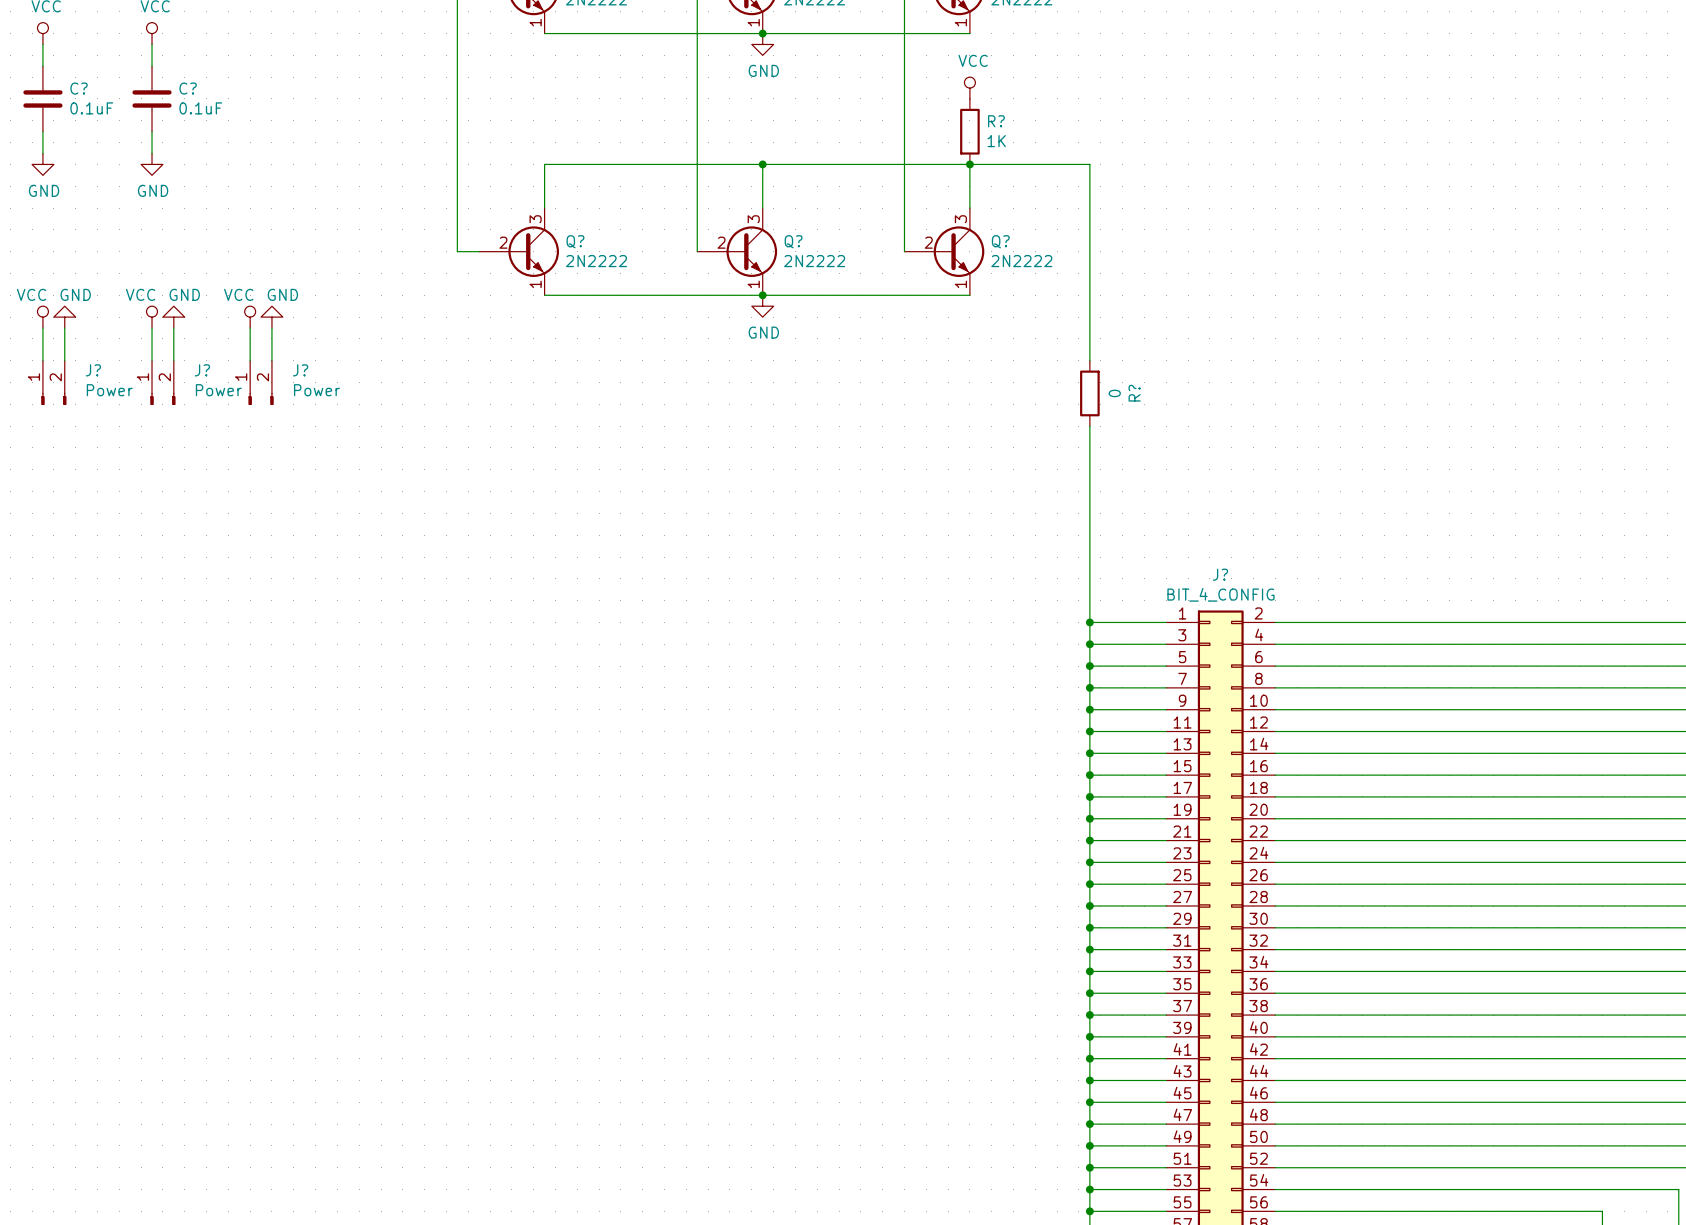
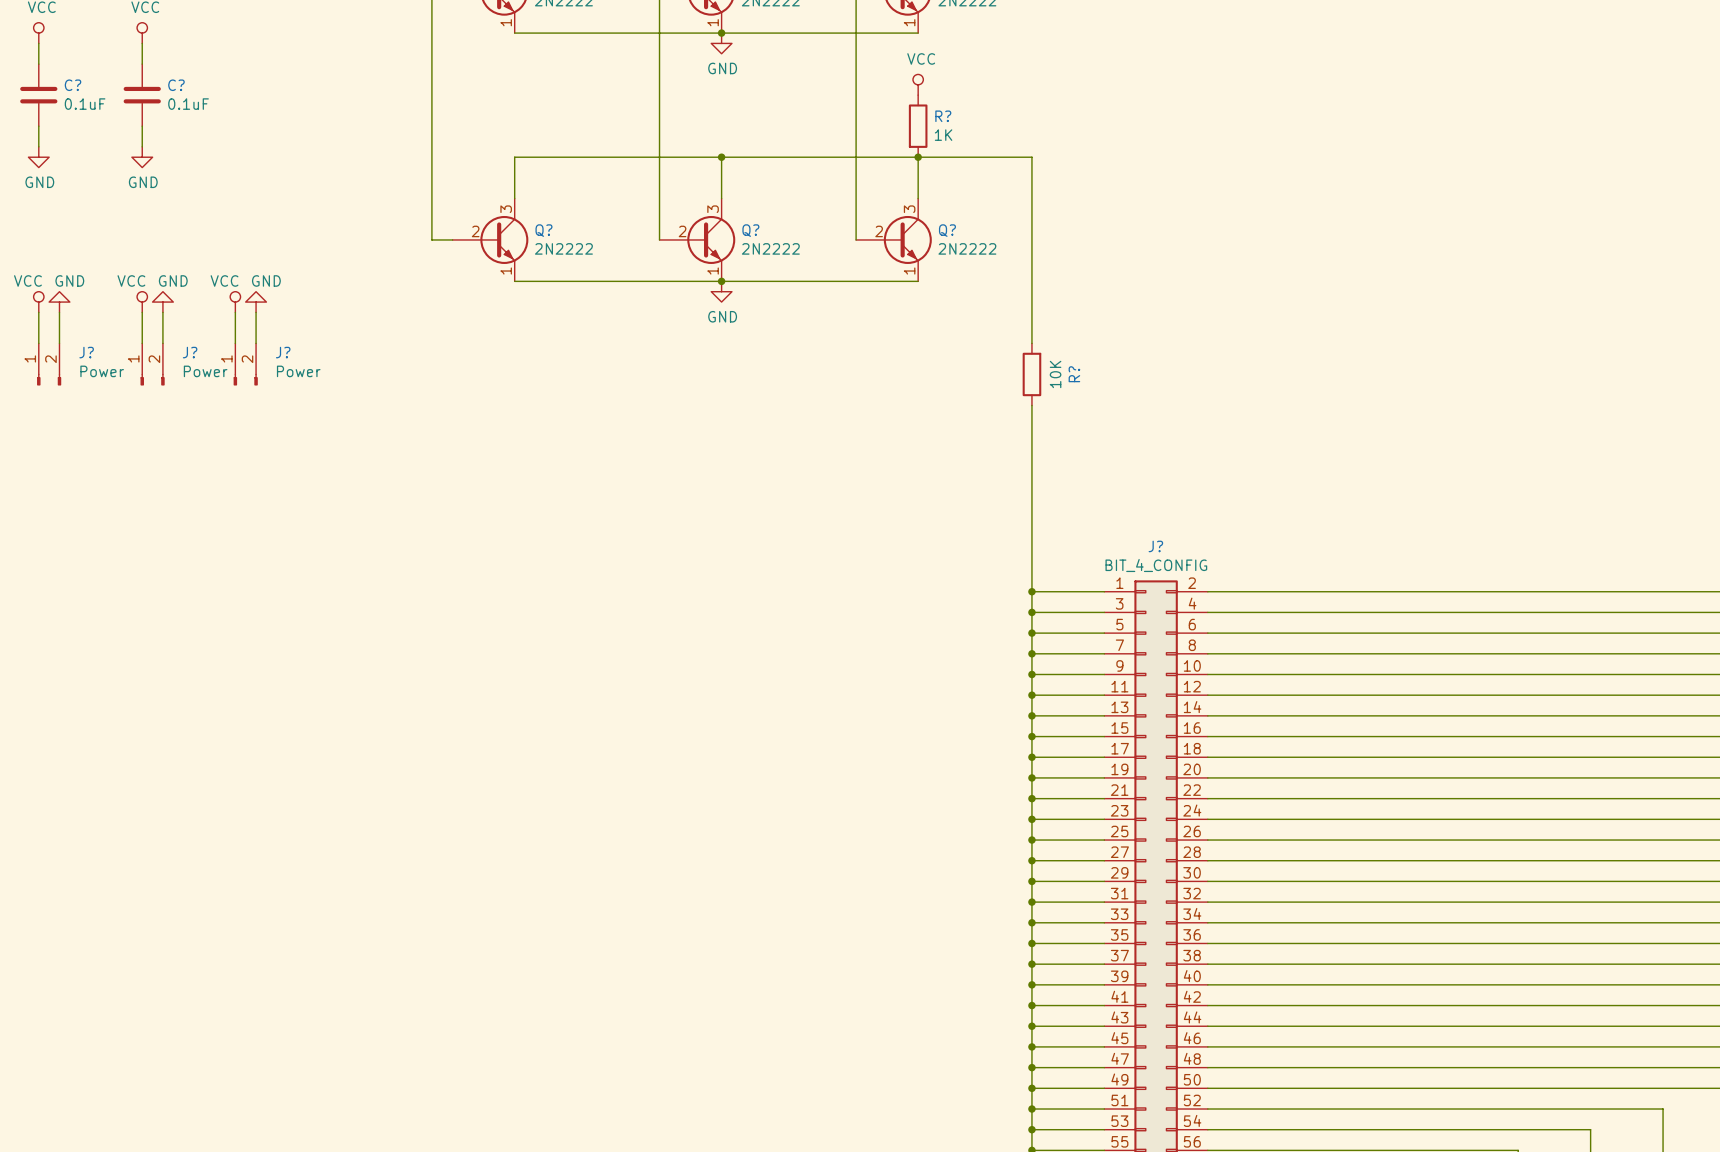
R? value: 0 (1114, 393) -> 10K (1055, 374)

